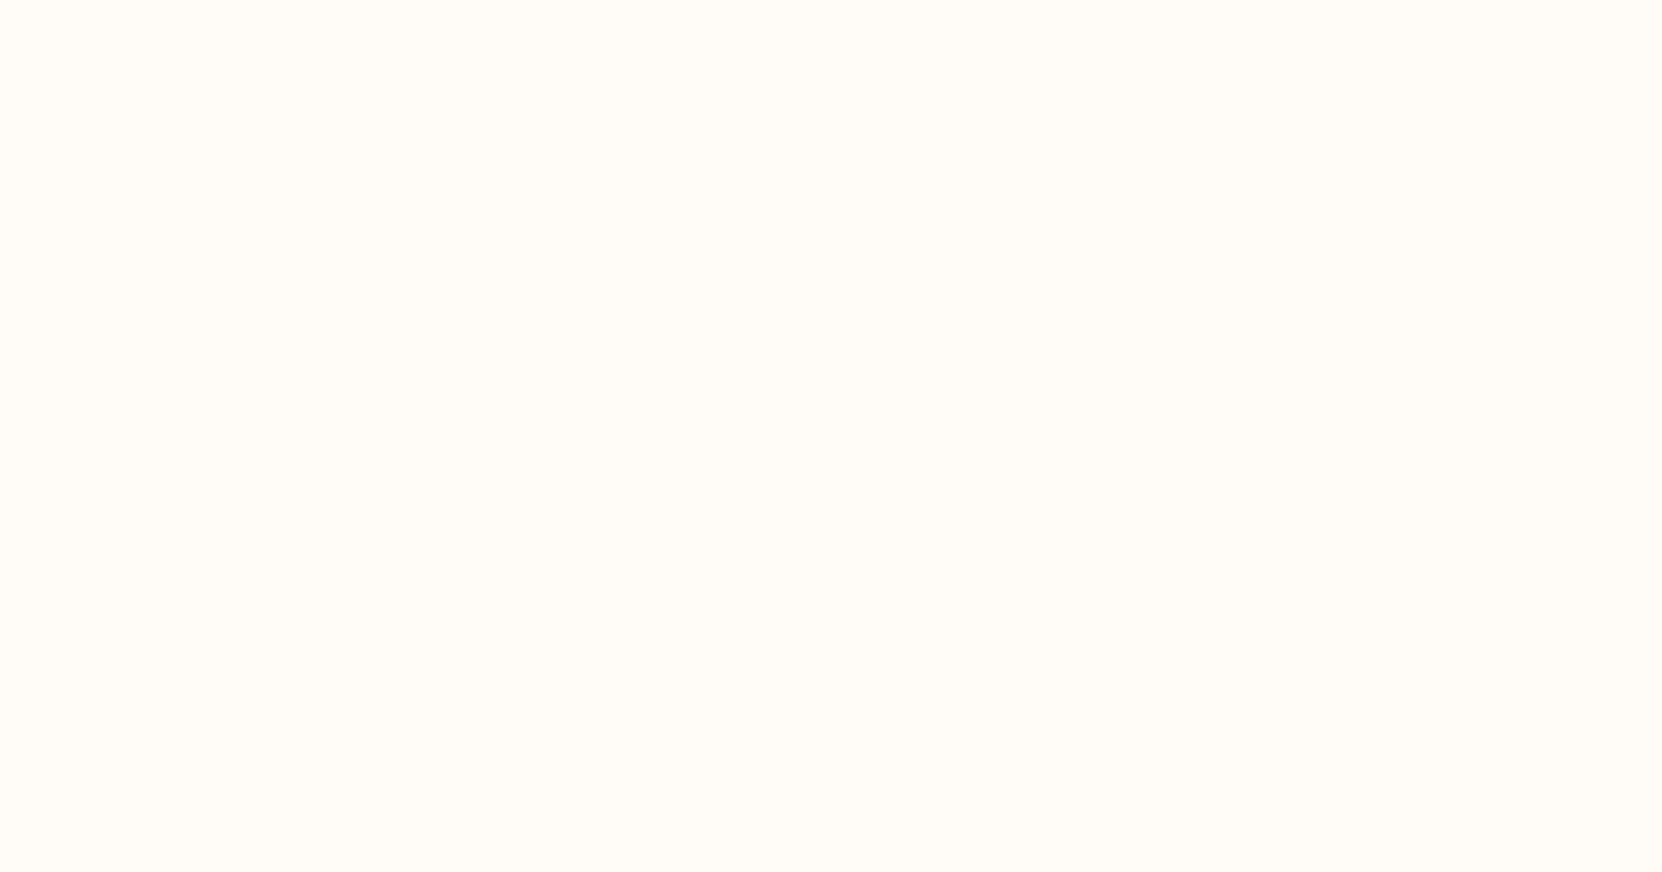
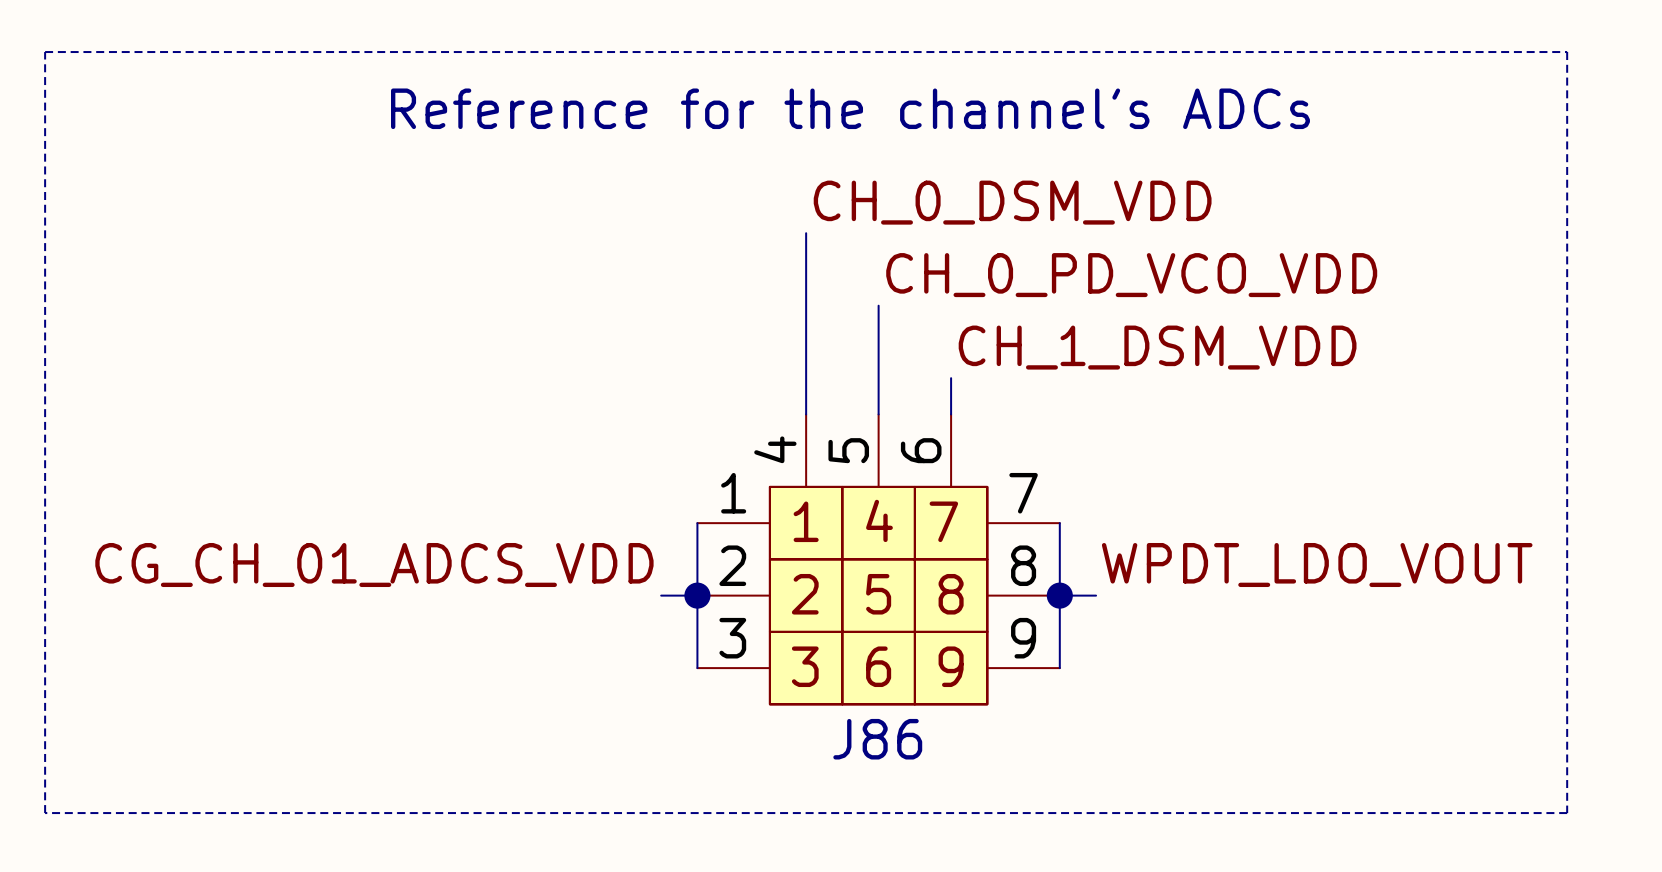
line: none -> (45, 52) (45, 813) (1567, 813) (1567, 52) (45, 52)
text: none -> Reference for the channel's ADCs (850, 108)
label: none -> CH_0_DSM_VDD (1012, 202)
wire: none -> (806, 233) (806, 414)
label: none -> CH_0_PD_VCO_VDD (1131, 275)
wire: none -> (878, 305) (878, 414)
label: none -> CH_1_DSM_VDD (1157, 347)
wire: none -> (951, 378) (951, 414)
wire: none -> (697, 523) (697, 668)
wire: none -> (1059, 523) (1059, 668)
J86: none -> (878, 559)
label: none -> CG_CH_01_ADCS_VDD (374, 565)
label: none -> WPDT_LDO_VOUT (1317, 565)
wire: none -> (661, 595) (697, 595)
junction: none -> (697, 595)
wire: none -> (1059, 595) (1096, 595)
junction: none -> (1059, 595)

